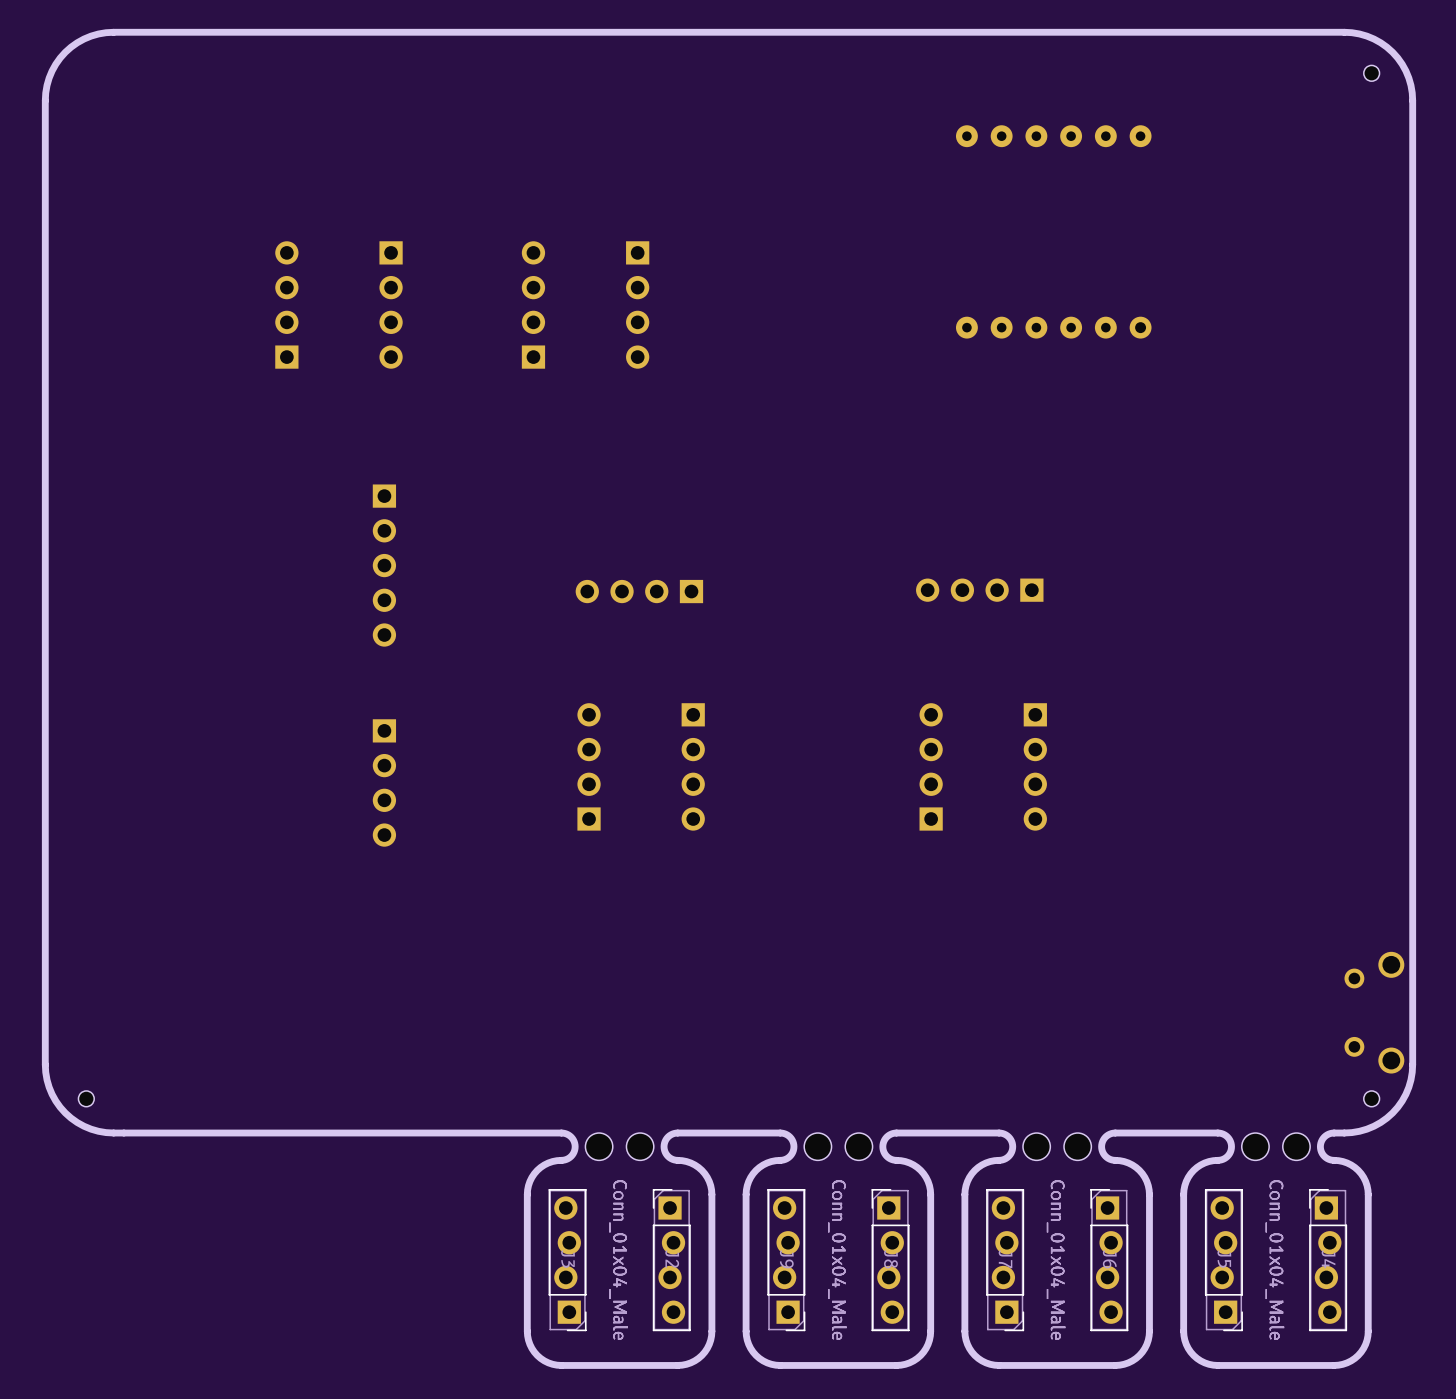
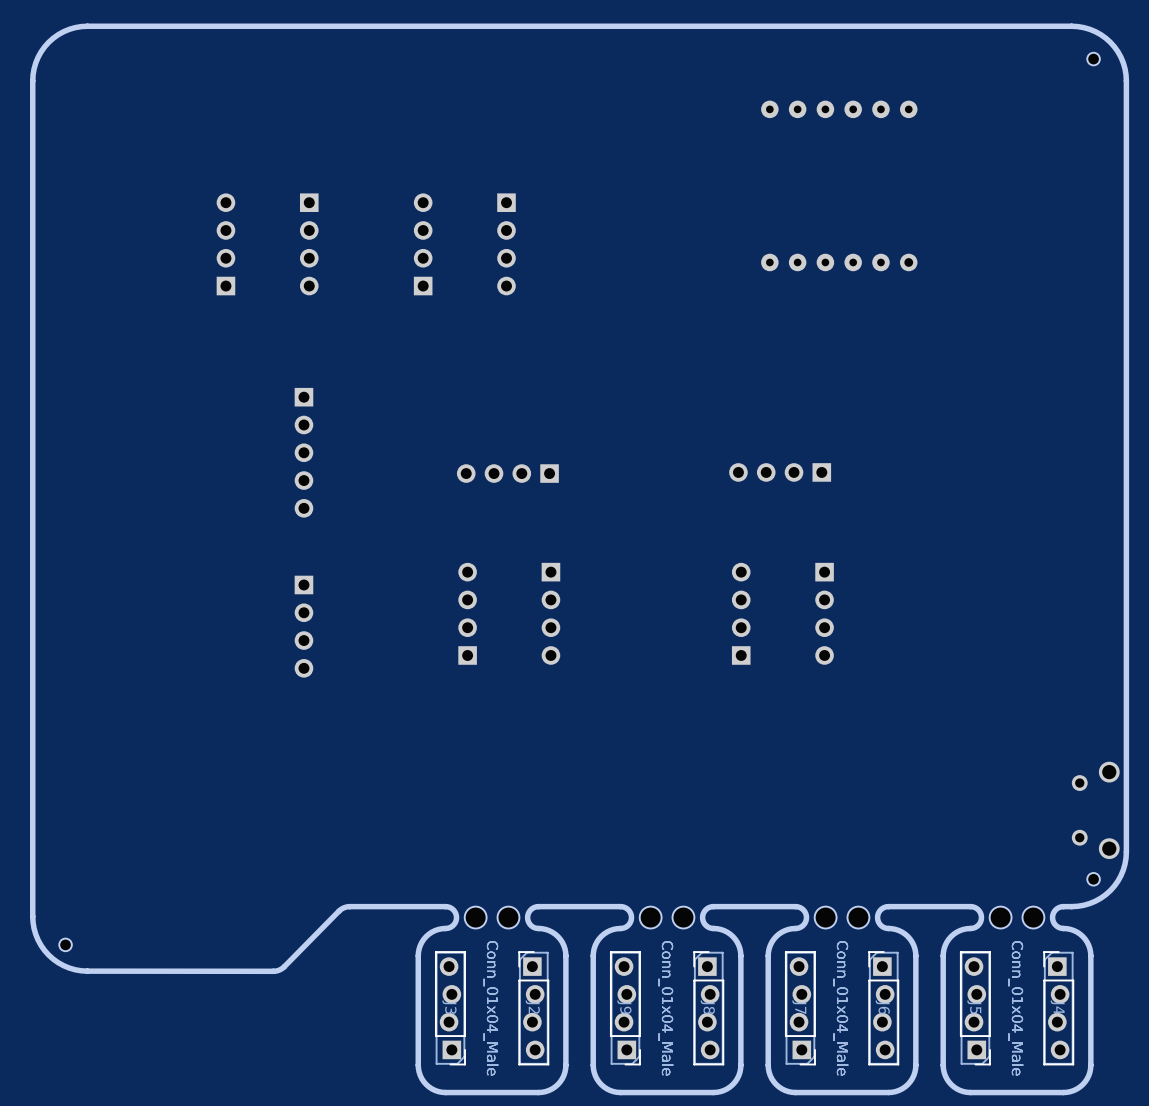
board edge: (45, 1064) (49, 1087) (60, 1107) (77, 1122) (98, 1131) (113, 1133) (441, 1133) -> (32, 851) (32, 916) (35, 934) (48, 955) (58, 962) (75, 969) (277, 970) (284, 966) (338, 911) (349, 906)
part position: (86, 1098) -> (65, 944)

